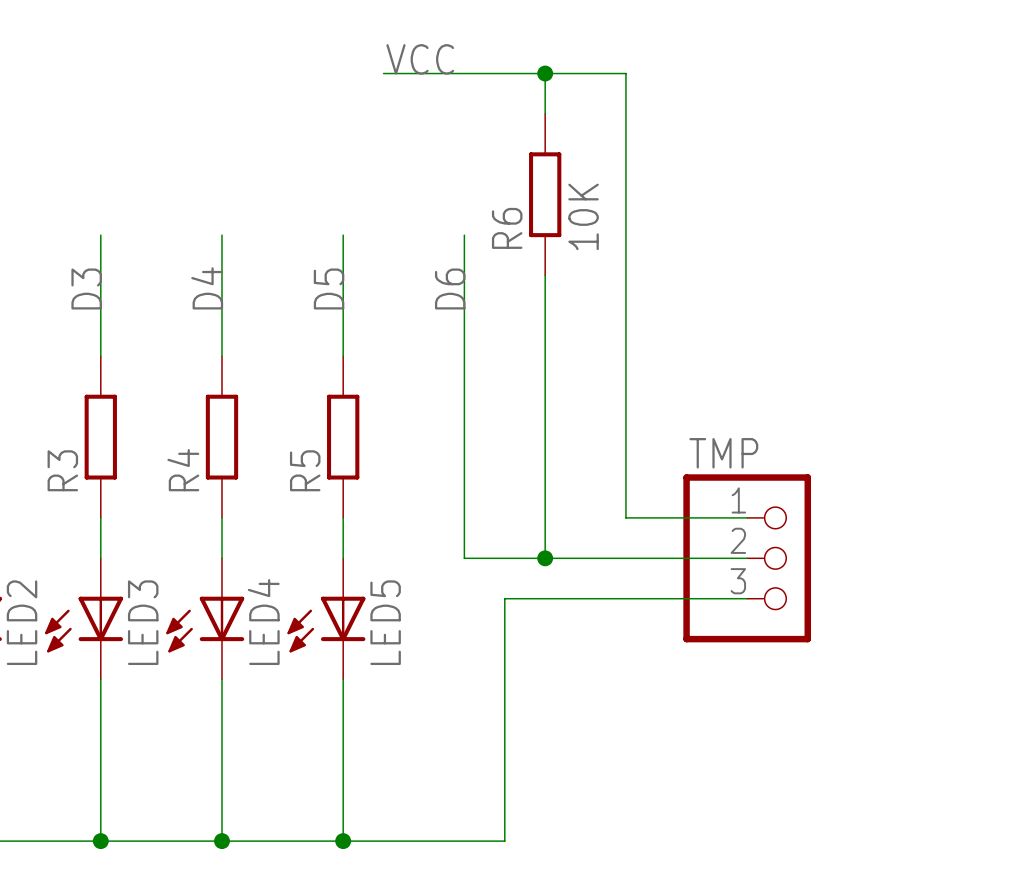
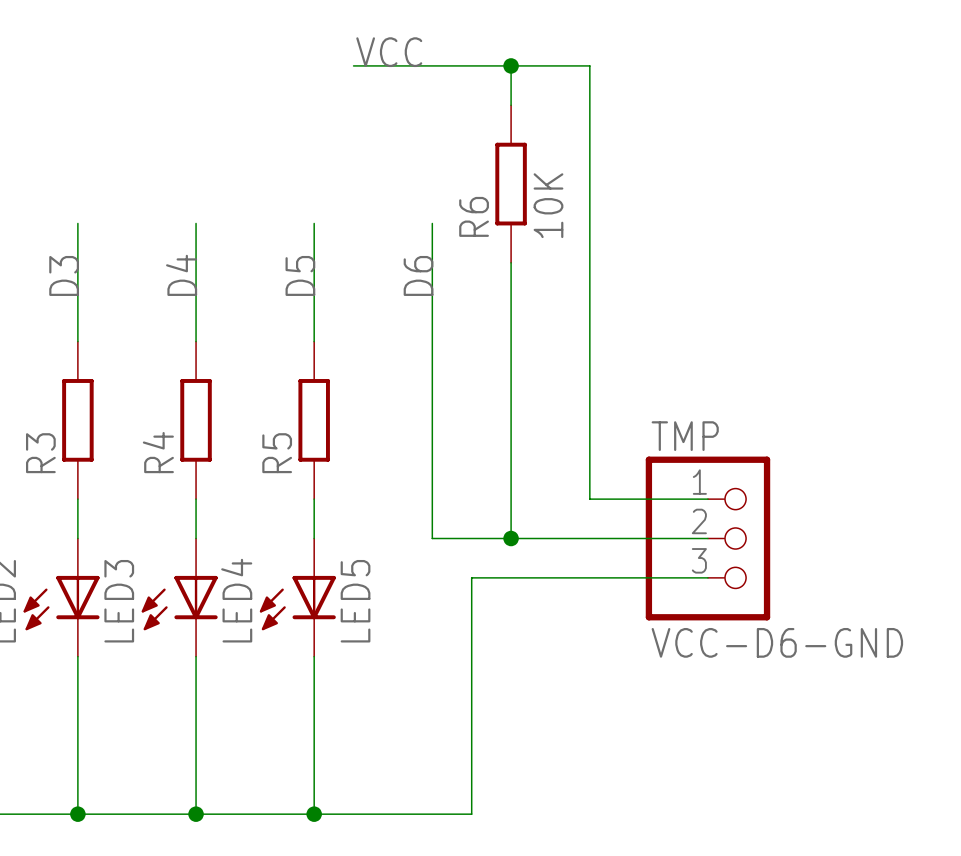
TMP value: none -> VCC-D6-GND (777, 642)

